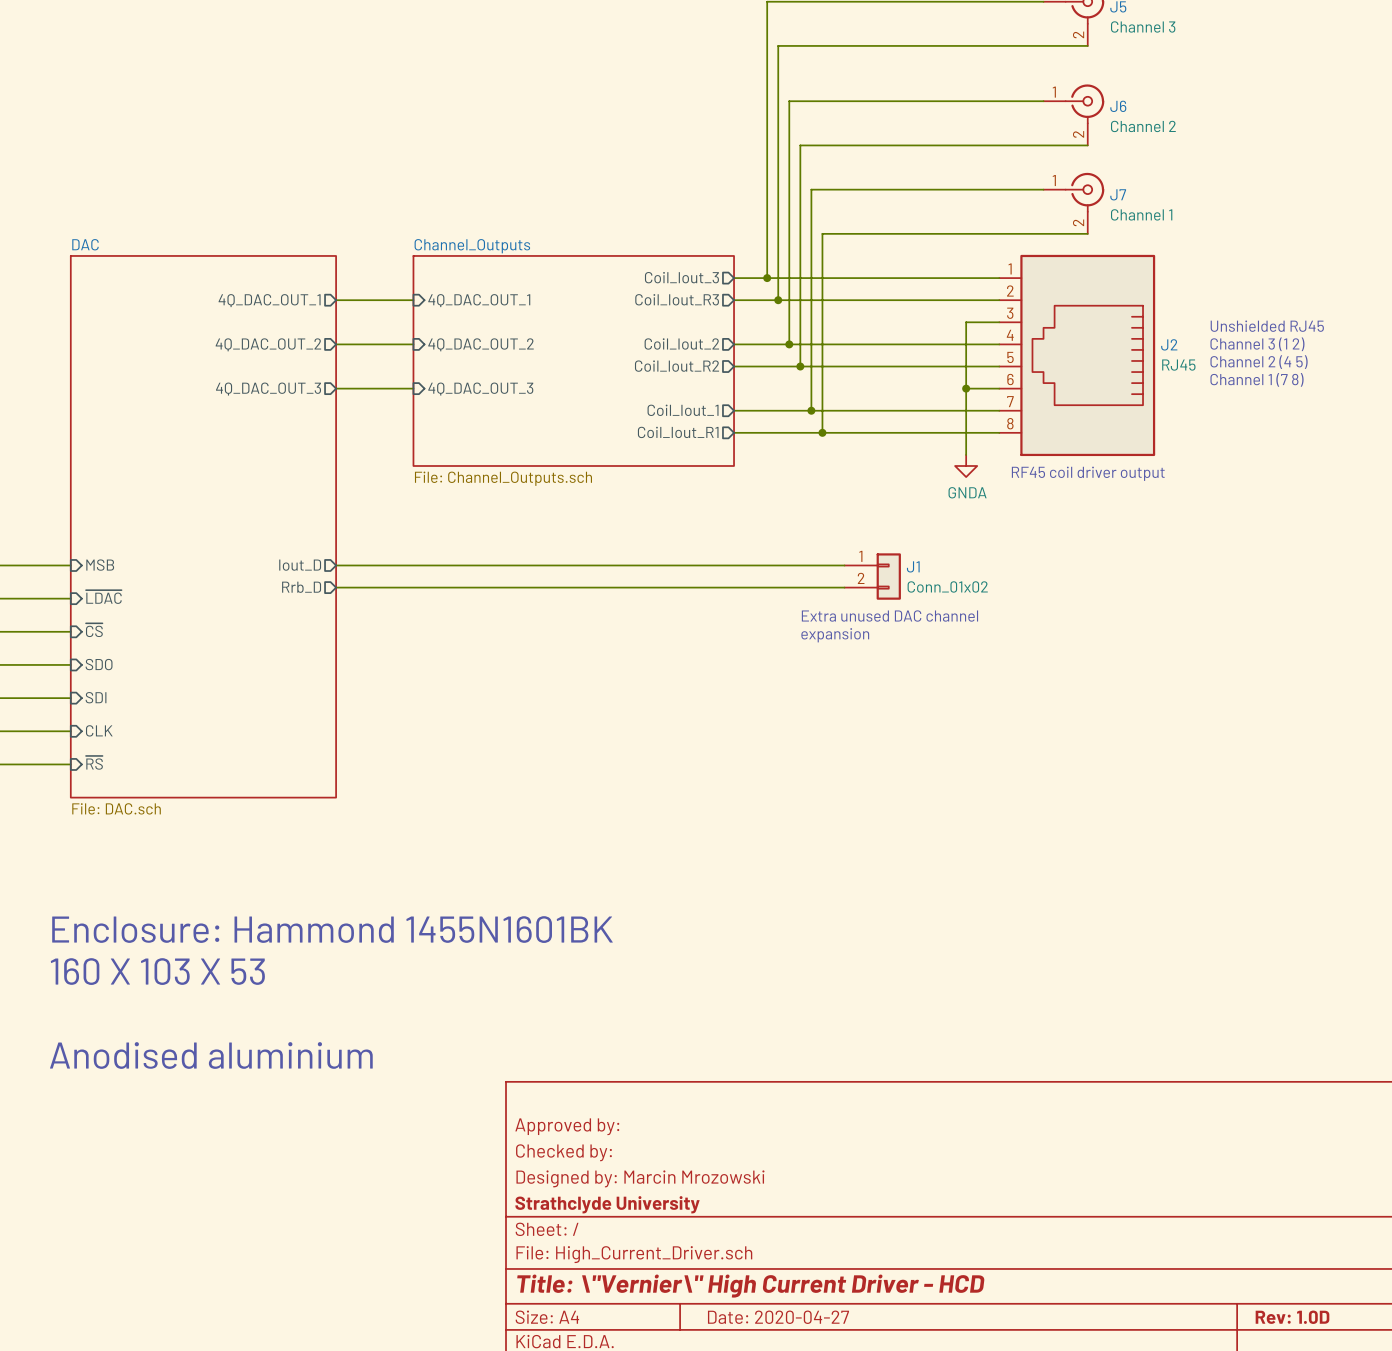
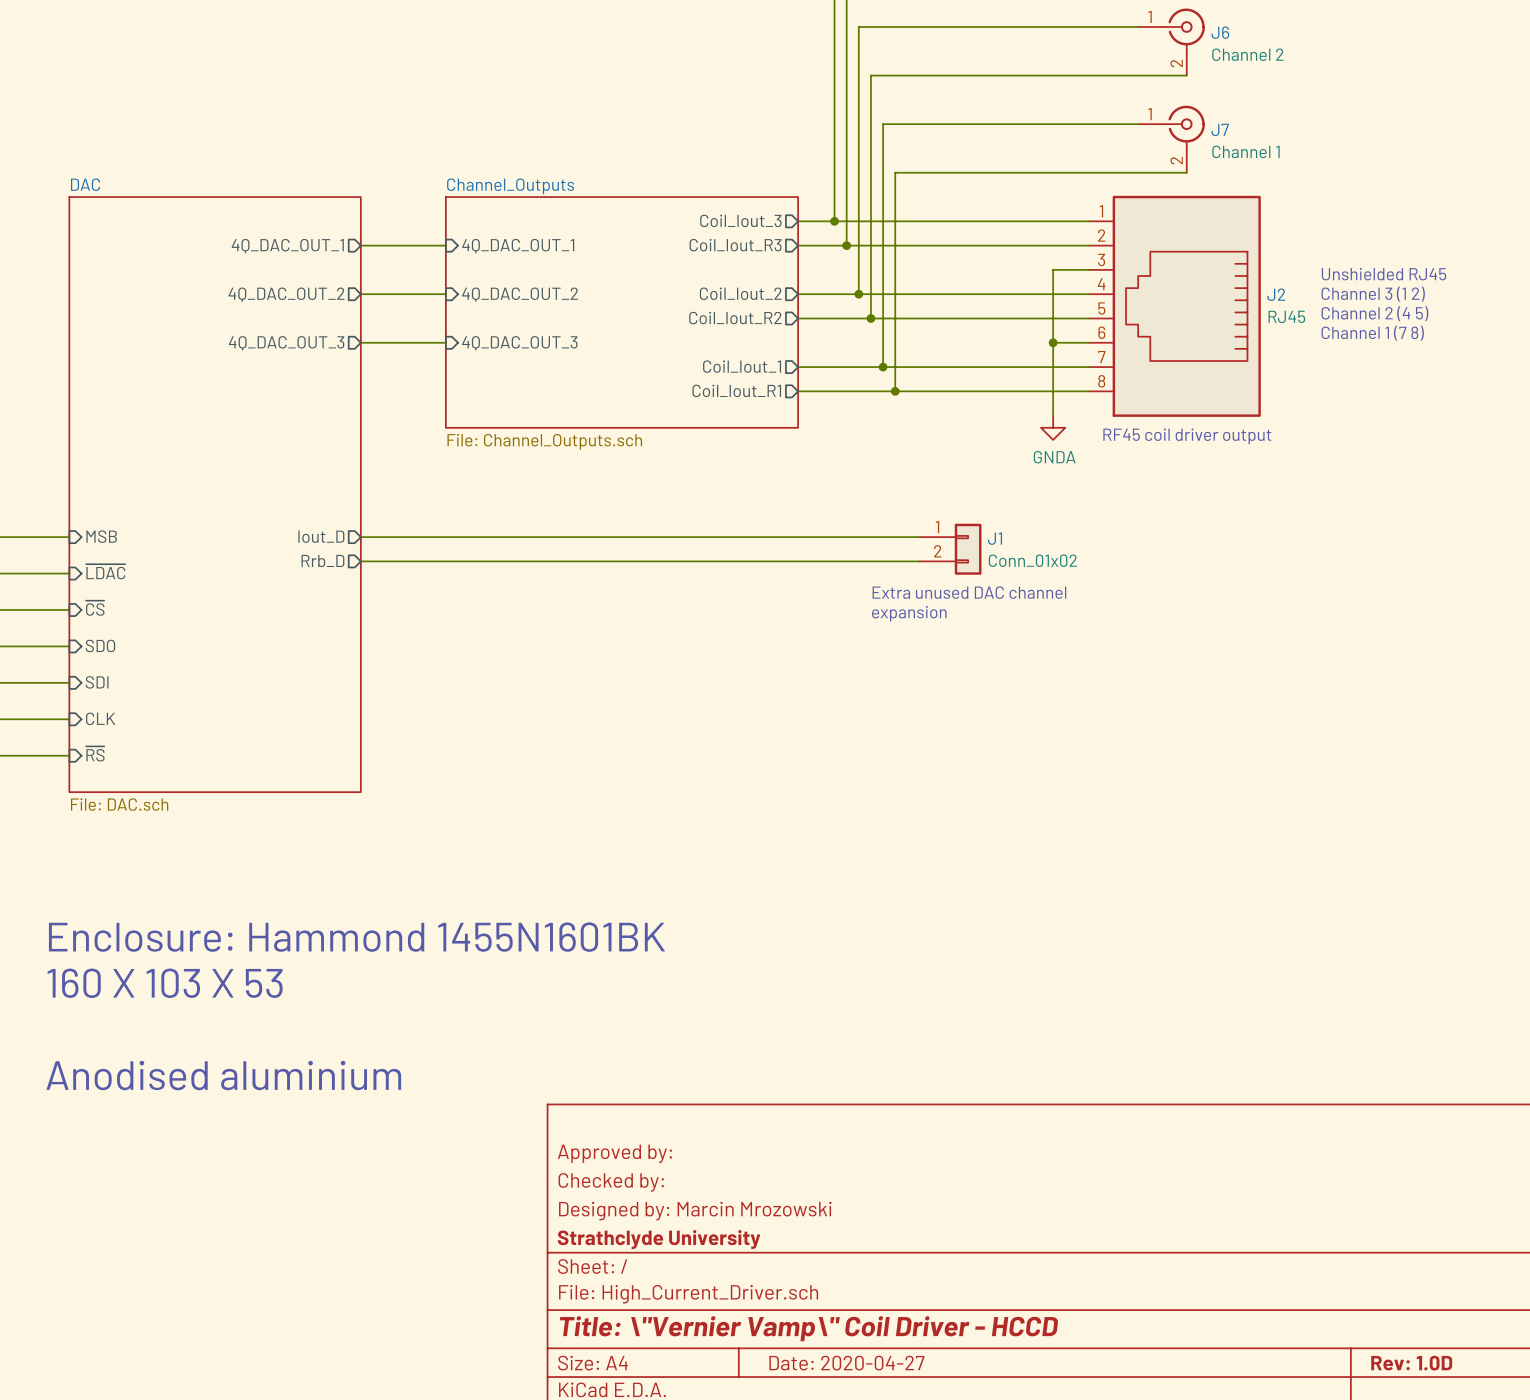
title block: Title: \"Vernier\" High Current Driver - HCD (750, 1286) -> Title: \"Vernier Vamp\" Coil Driver - HCCD (809, 1328)

